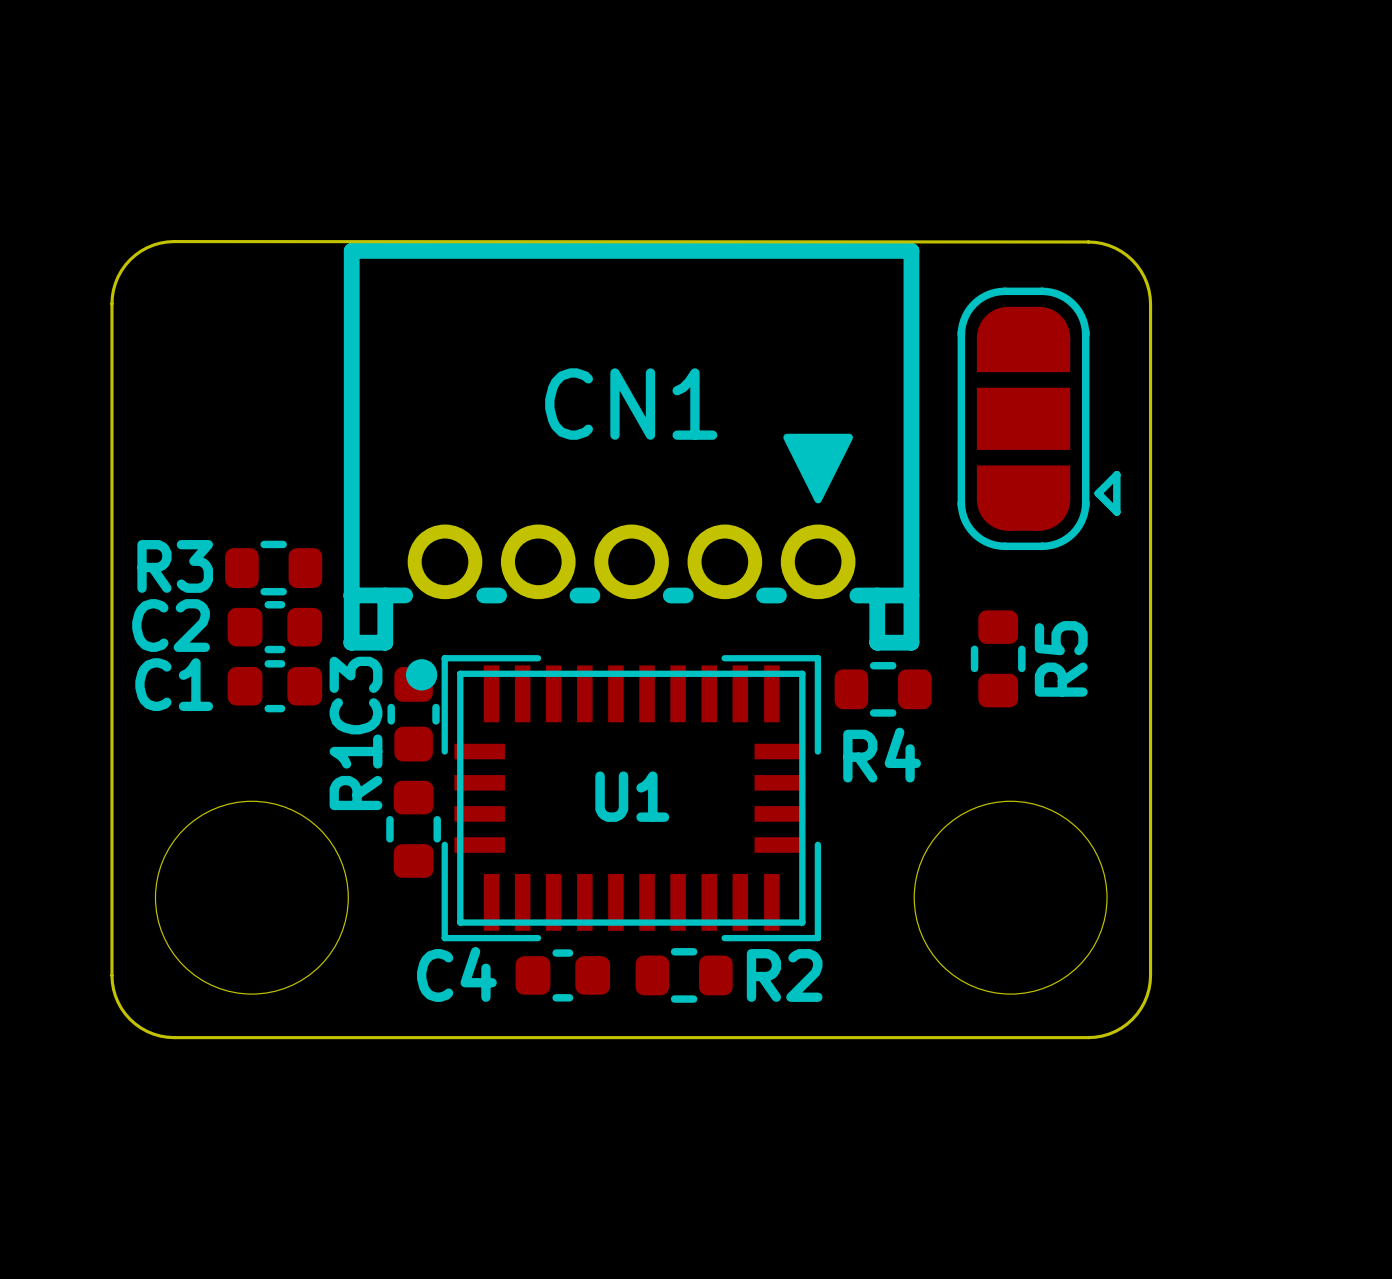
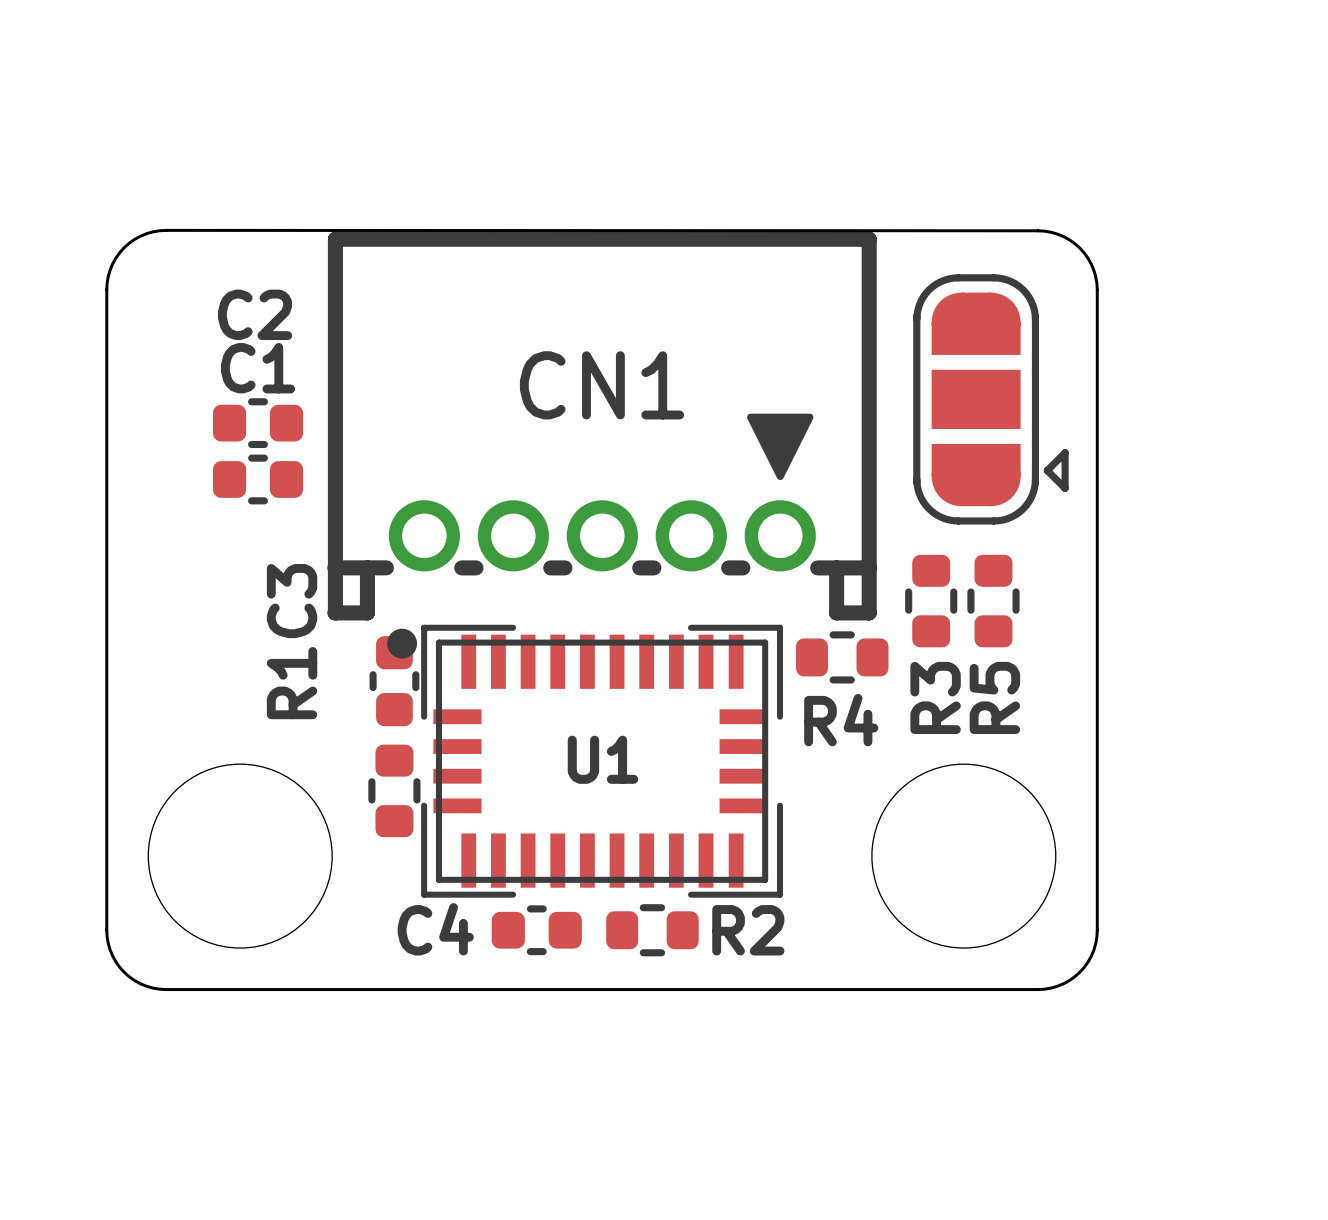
R3 name position: R3 (175, 566) -> R3 (935, 697)
R3 rotation: 0° (273, 568) -> 90° clockwise (931, 601)
R3 position: (273, 568) -> (931, 601)
C2 name position: C2 (171, 625) -> C2 (255, 314)
C2 position: (274, 627) -> (258, 423)
R5 position: (998, 658) -> (993, 601)
R5 name position: R5 (1061, 658) -> R5 (994, 697)
C1 name position: C1 (174, 684) -> C1 (258, 368)
C1 position: (274, 686) -> (258, 479)
C3 name position: C3 (355, 695) -> C3 (292, 601)
R1 name position: R1 (355, 772) -> R1 (292, 683)

